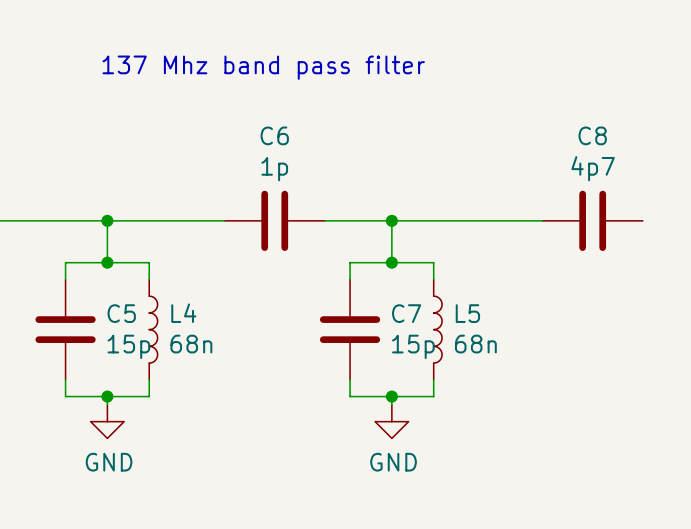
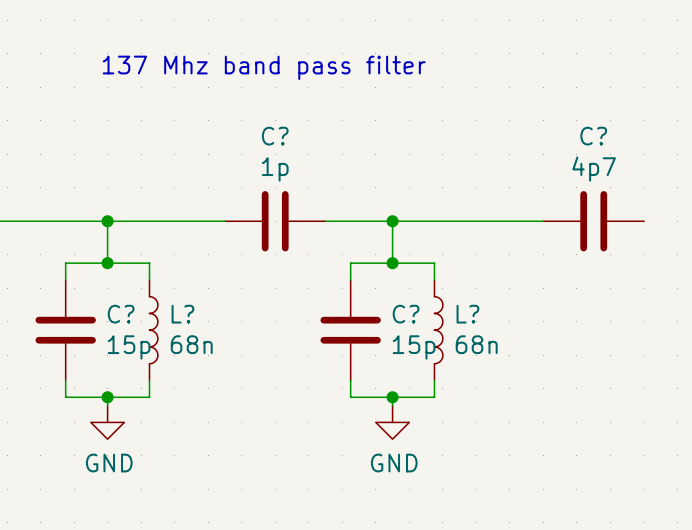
C6 name: C6 (274, 135) -> C? (275, 136)
C8 name: C8 (592, 135) -> C? (593, 136)
C5 name: C5 (121, 313) -> C? (121, 314)
L4 name: L4 (183, 313) -> L? (182, 314)
C7 name: C7 (406, 313) -> C? (406, 314)
L5 name: L5 (467, 313) -> L? (467, 314)

